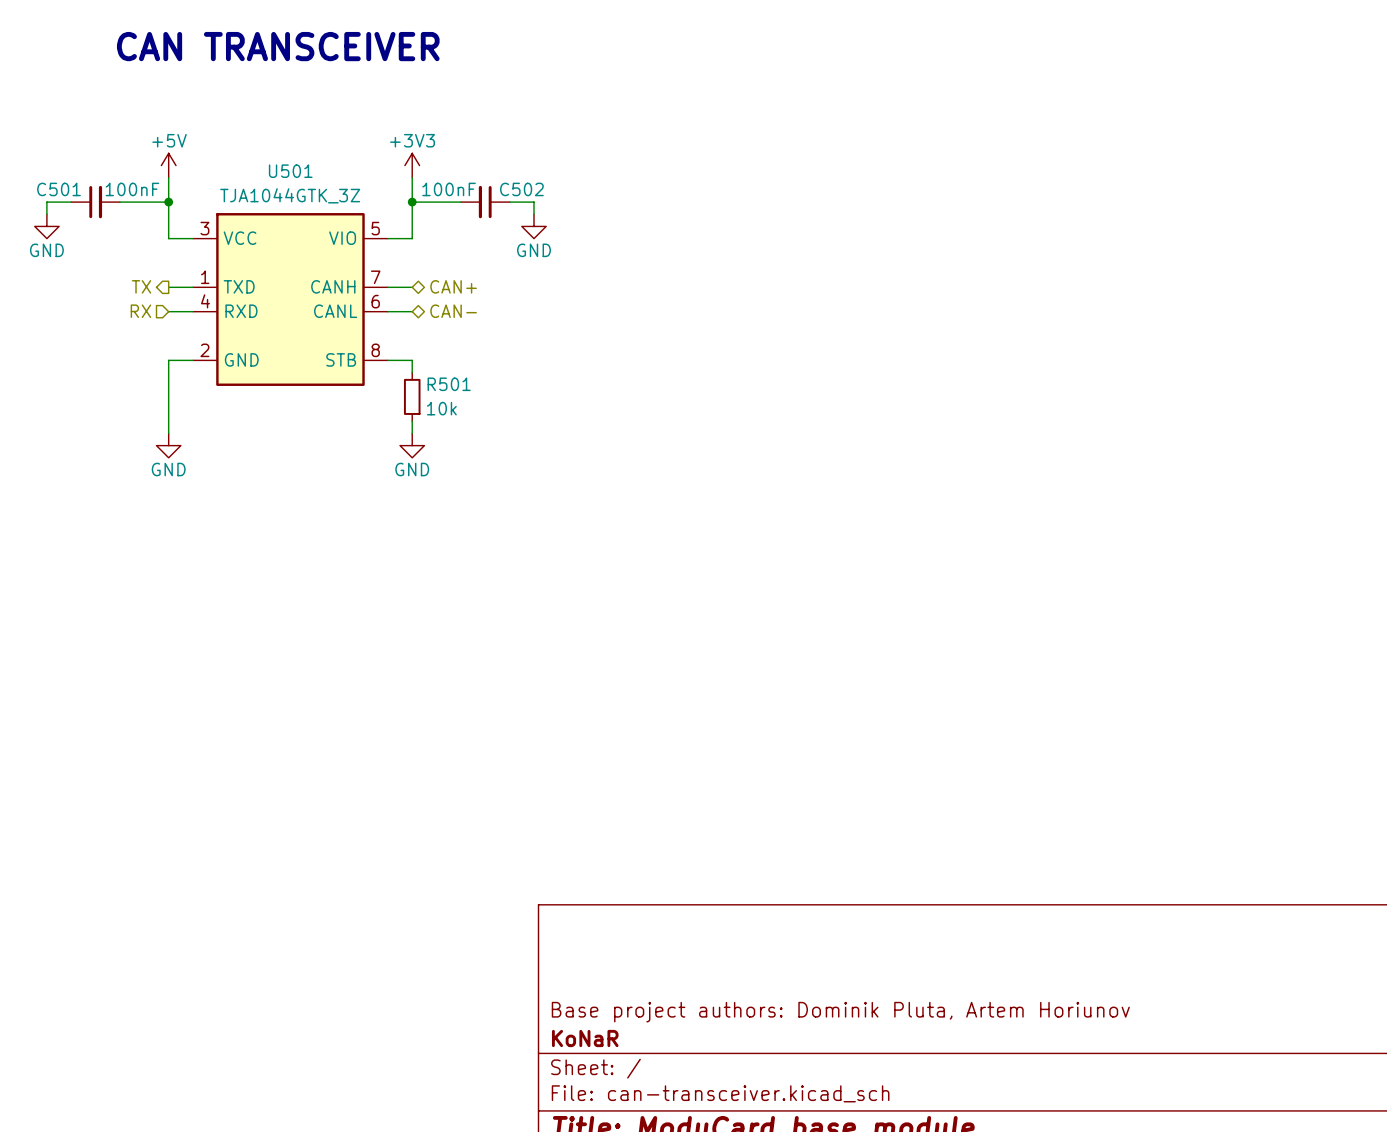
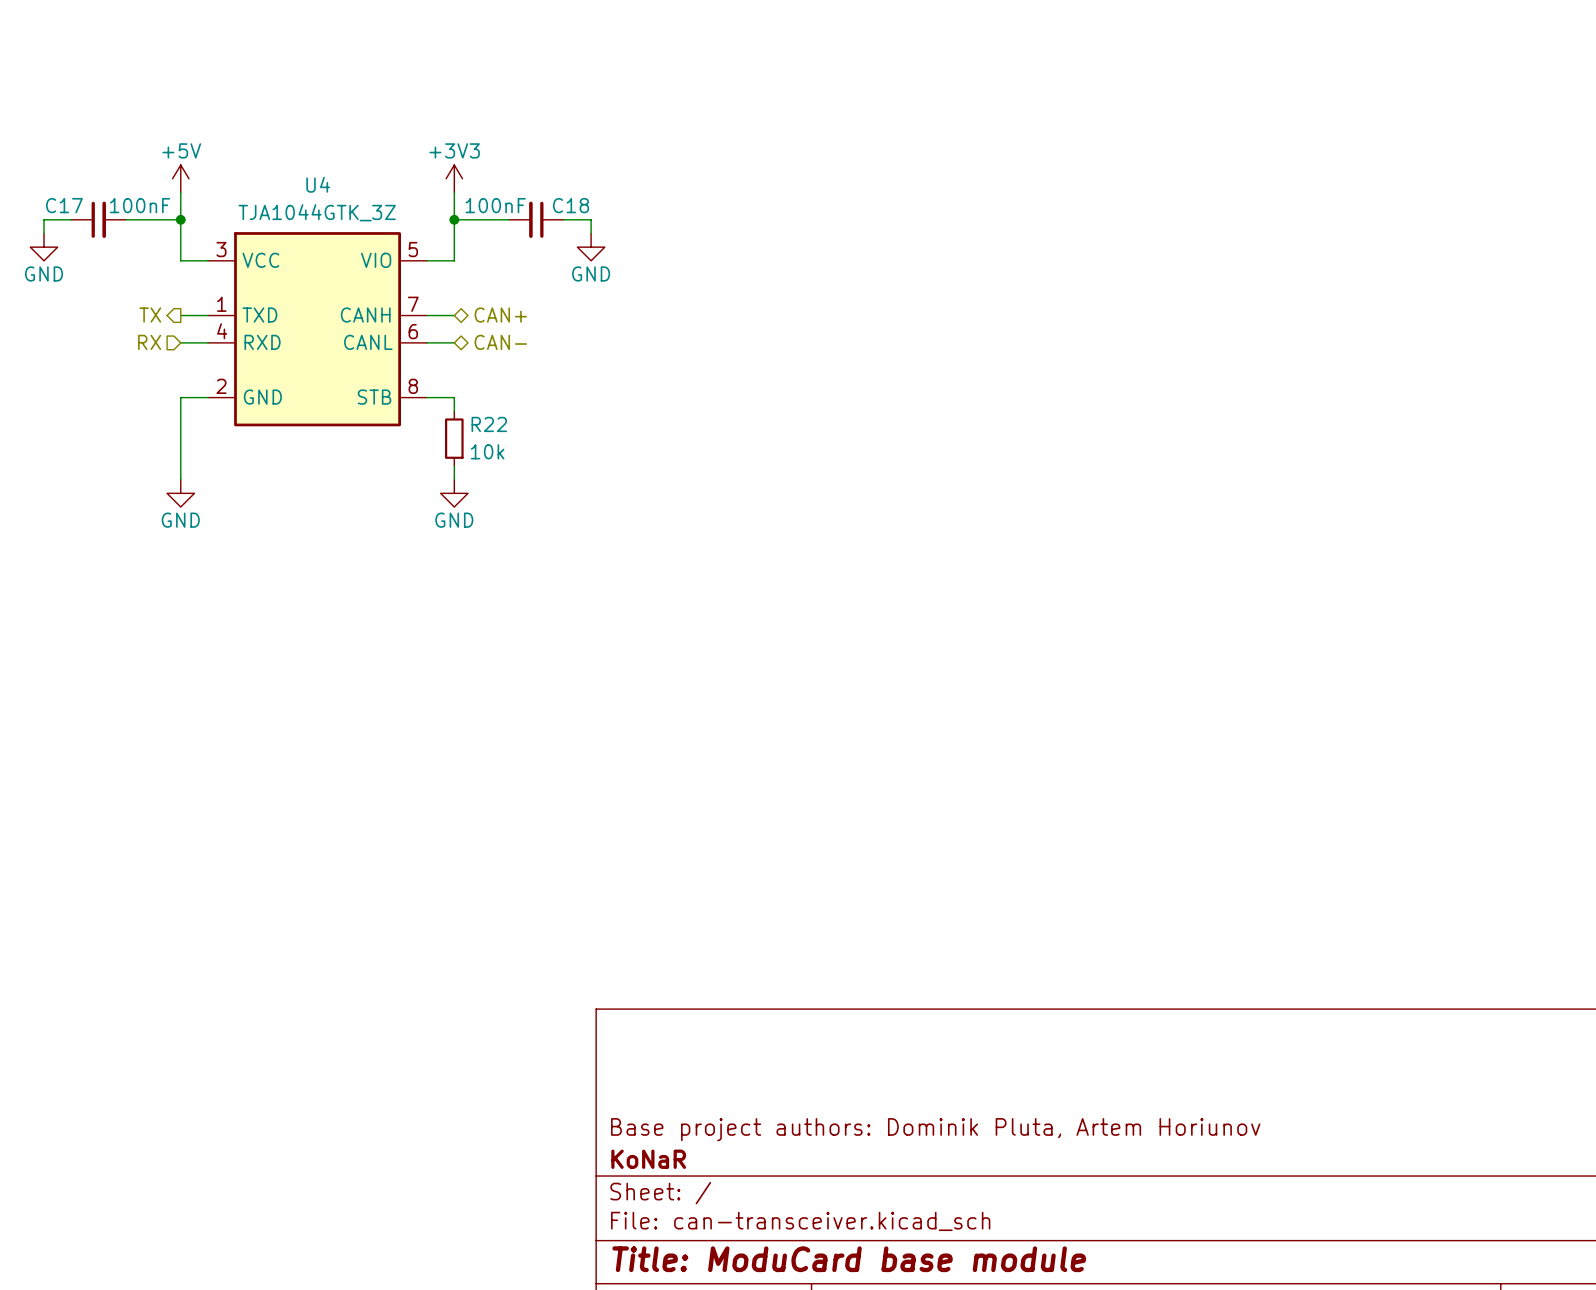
text: CAN TRANSCEIVER (278, 46) -> none
U501 name: U501 (290, 171) -> U4 (318, 184)
C501 name: C501 (58, 189) -> C17 (64, 205)
C502 name: C502 (521, 189) -> C18 (571, 205)
R501 name: R501 (449, 384) -> R22 (489, 424)

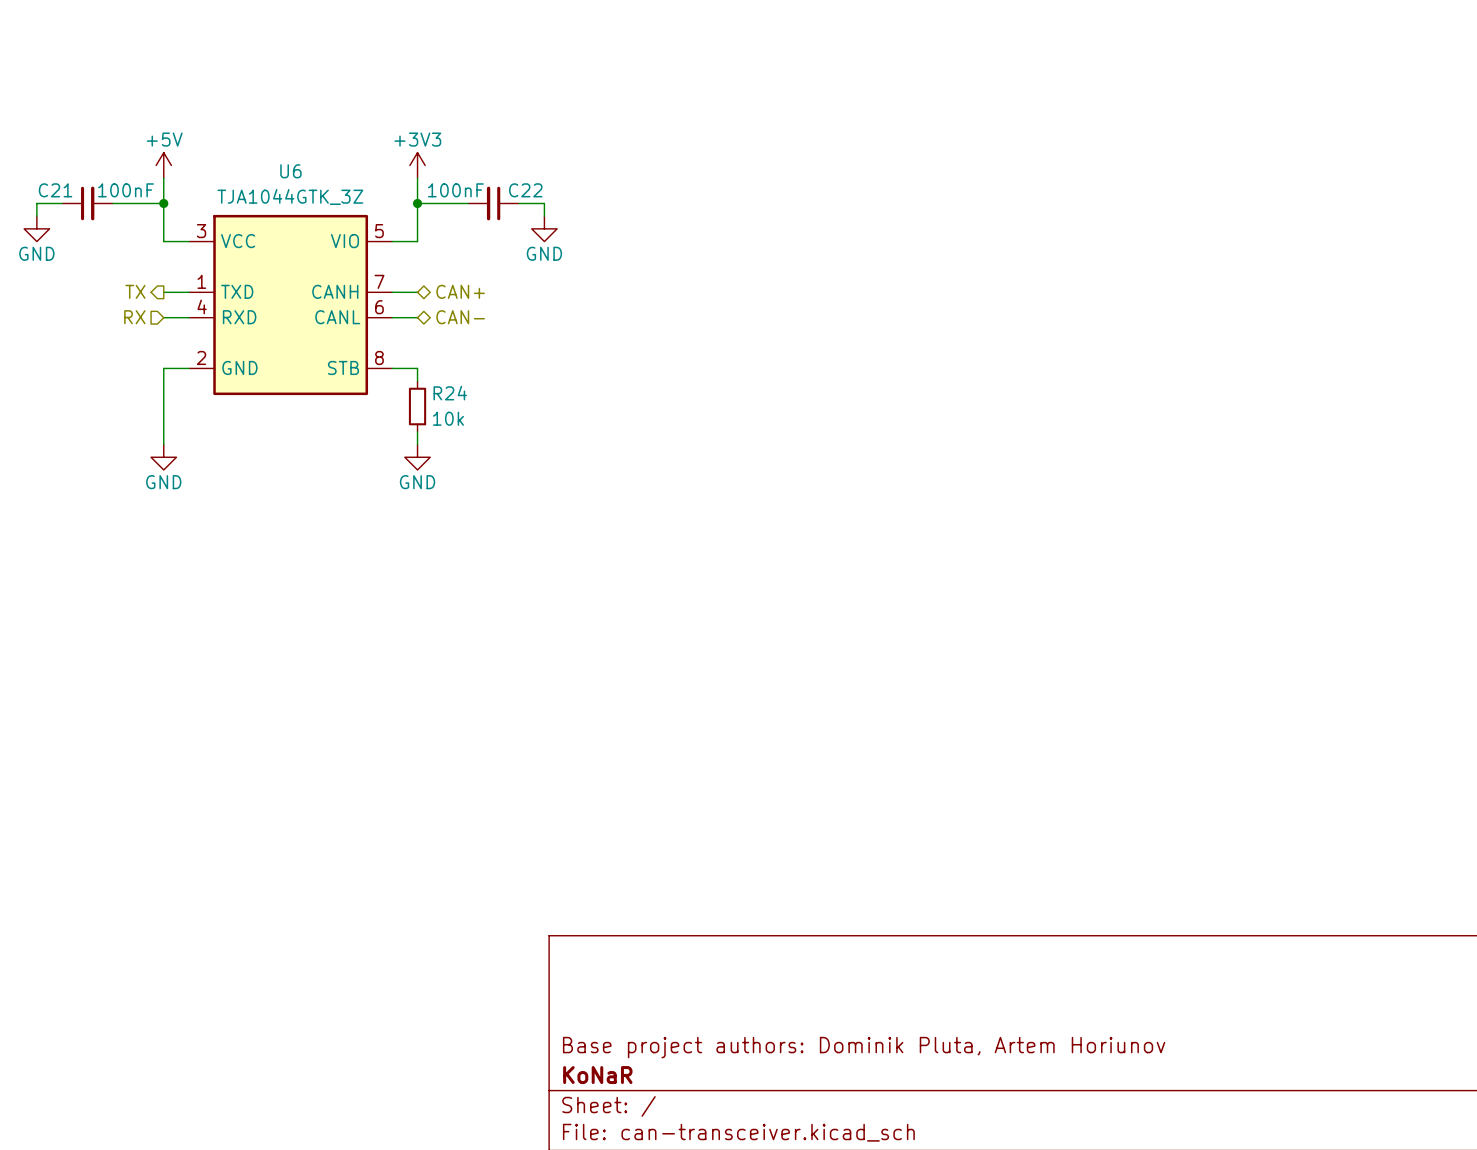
U4 name: U4 (318, 184) -> U6 (290, 171)
C17 name: C17 (64, 205) -> C21 (55, 190)
C18 name: C18 (571, 205) -> C22 (525, 190)
R22 name: R22 (489, 424) -> R24 (450, 393)

